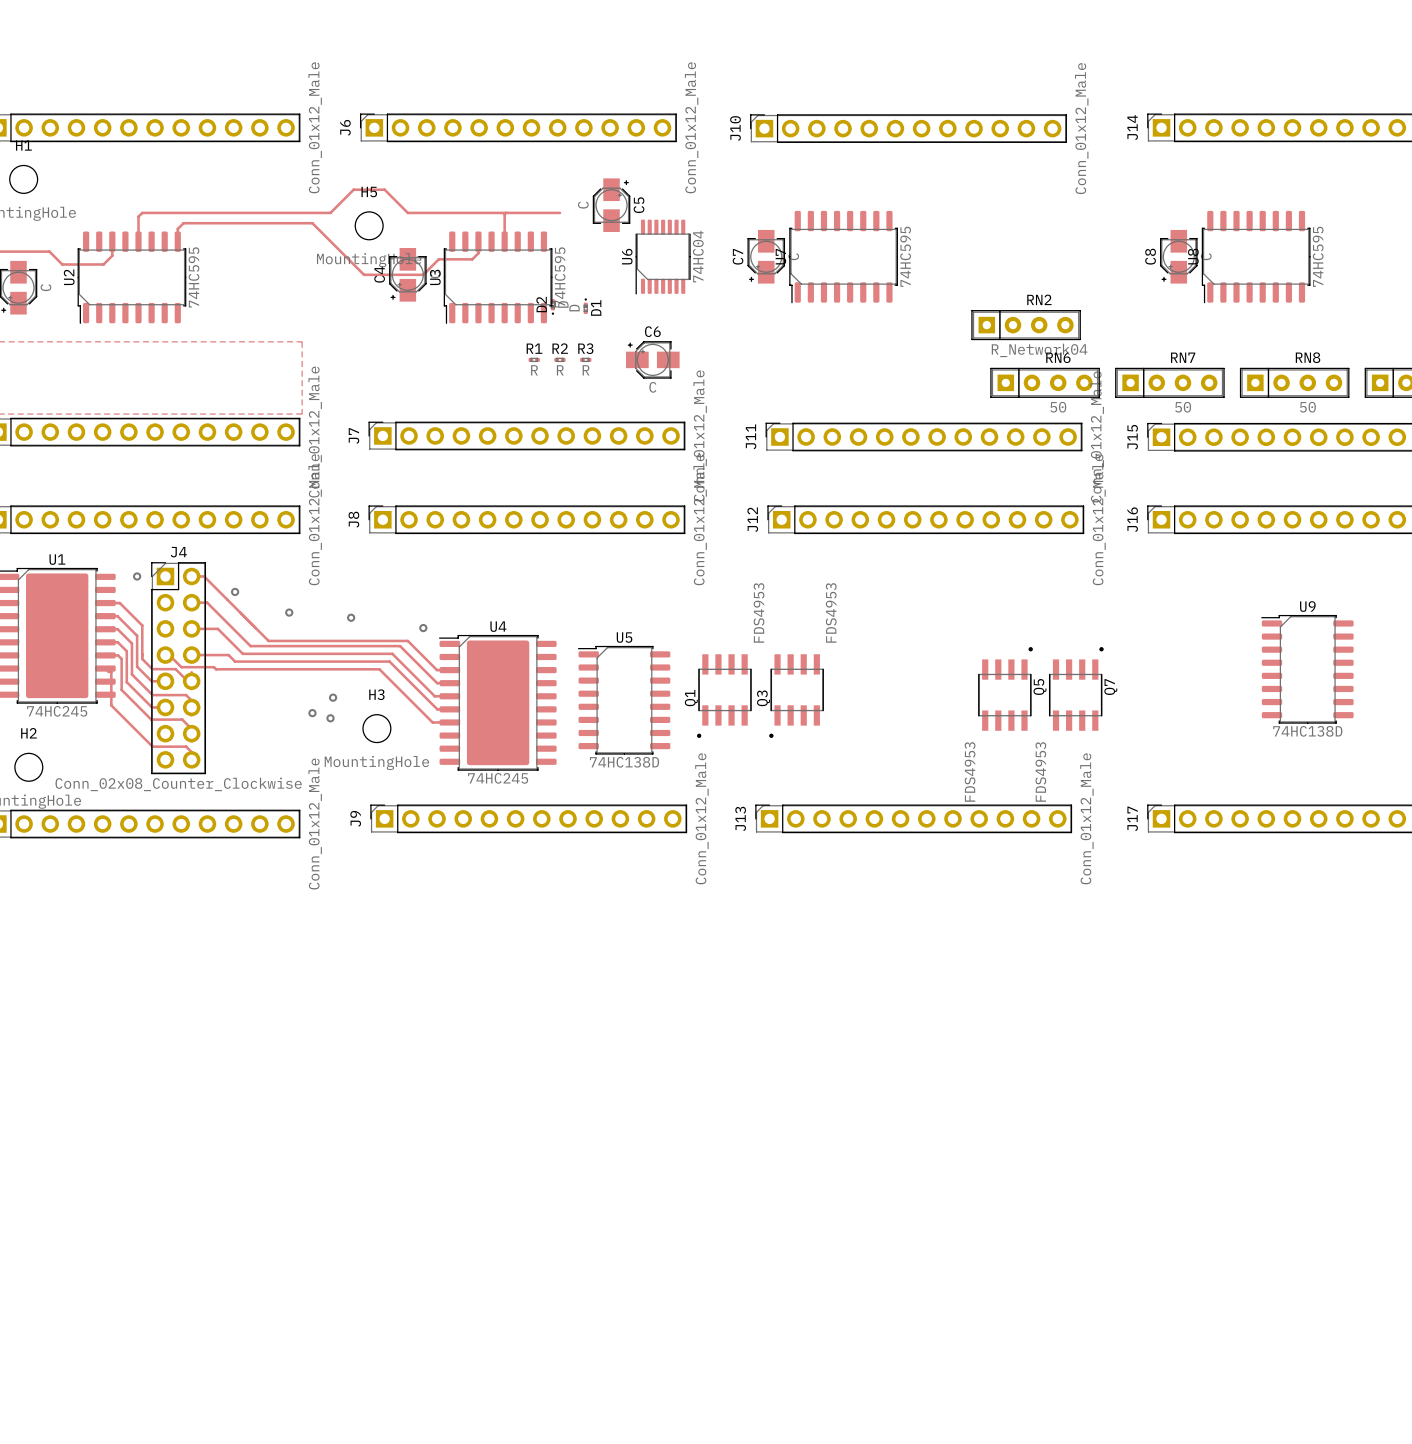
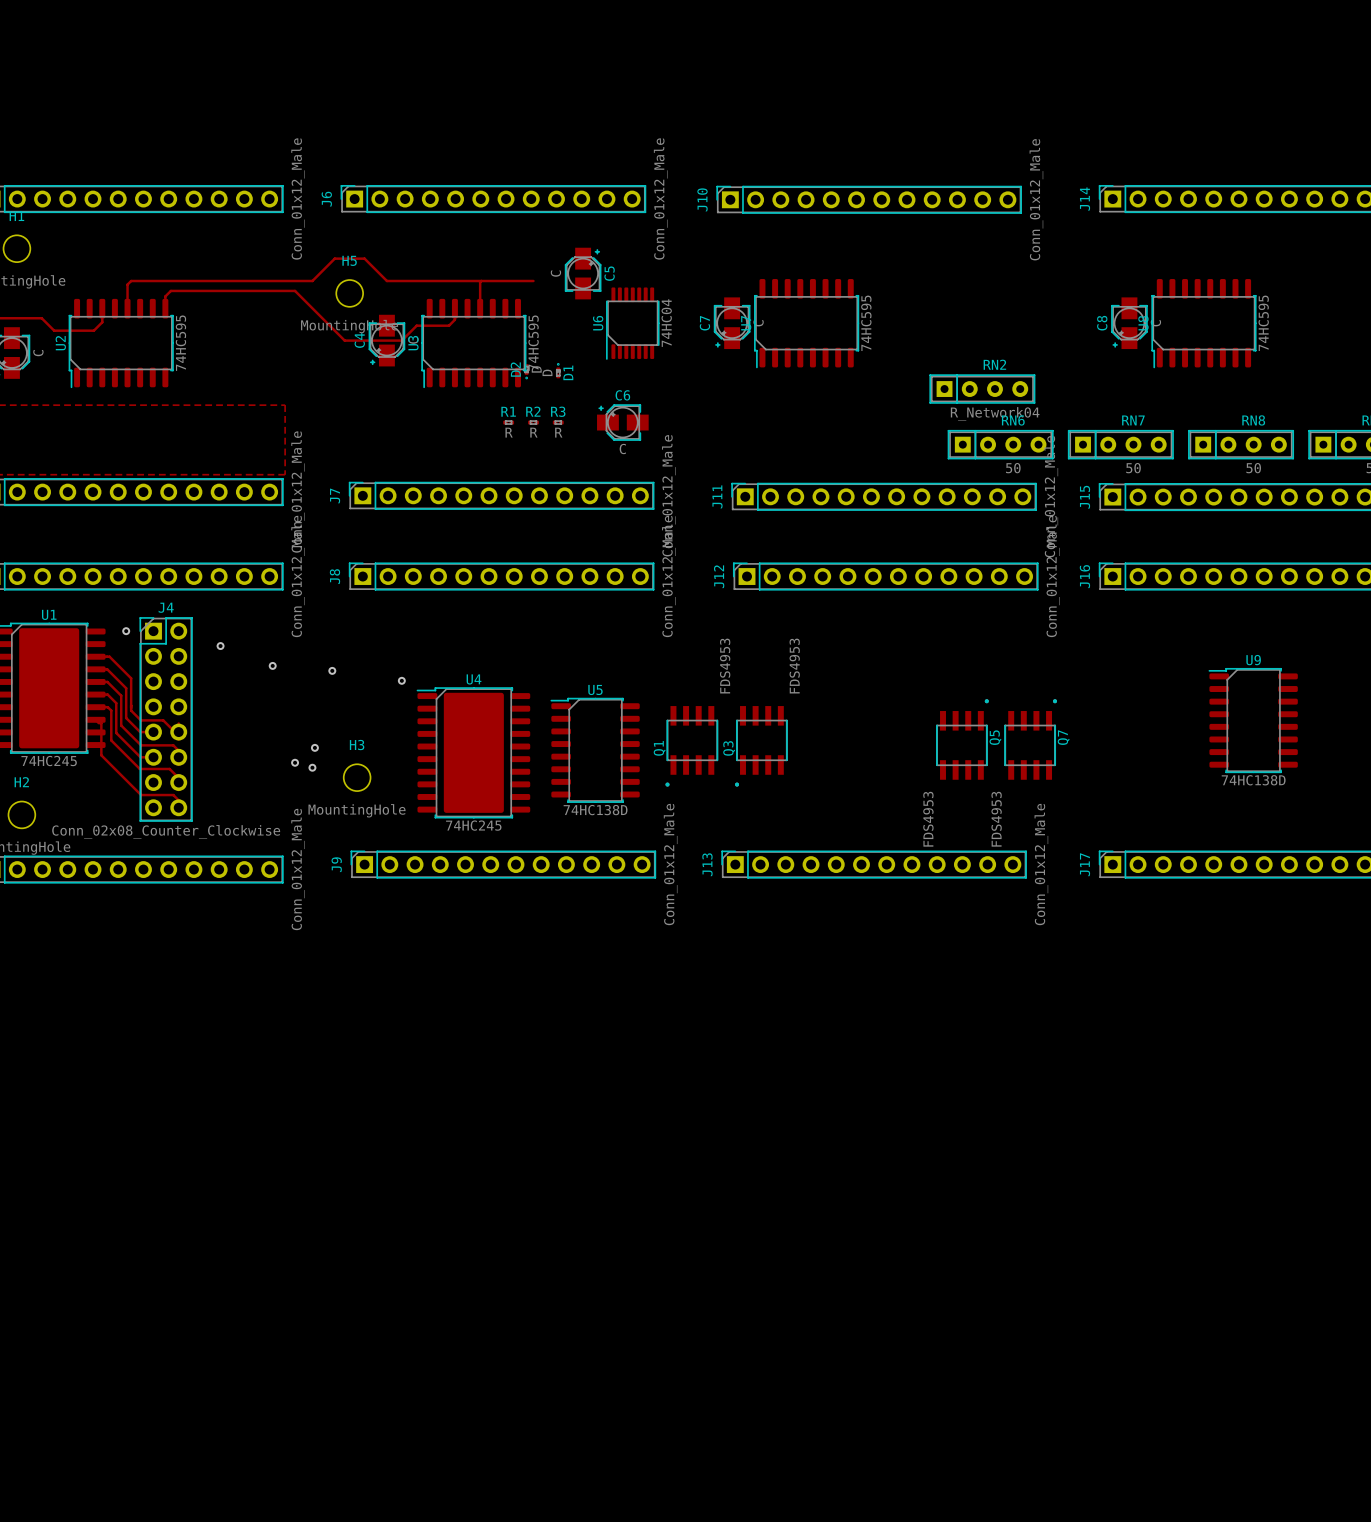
top track: (191, 576) (204, 576) (268, 640) (407, 640) (436, 670) (449, 670) -> none
top track: (191, 602) (207, 602) (250, 646) (400, 646) (437, 683) (449, 683) -> none
top track: (191, 628) (217, 628) (242, 653) (392, 653) (434, 696) (449, 696) -> none
top track: (165, 655) (169, 655) (181, 667) (214, 667) (216, 669) (379, 669) (432, 722) (449, 722) -> none
top track: (191, 655) (228, 655) (235, 661) (389, 661) (437, 709) (449, 709) -> none

